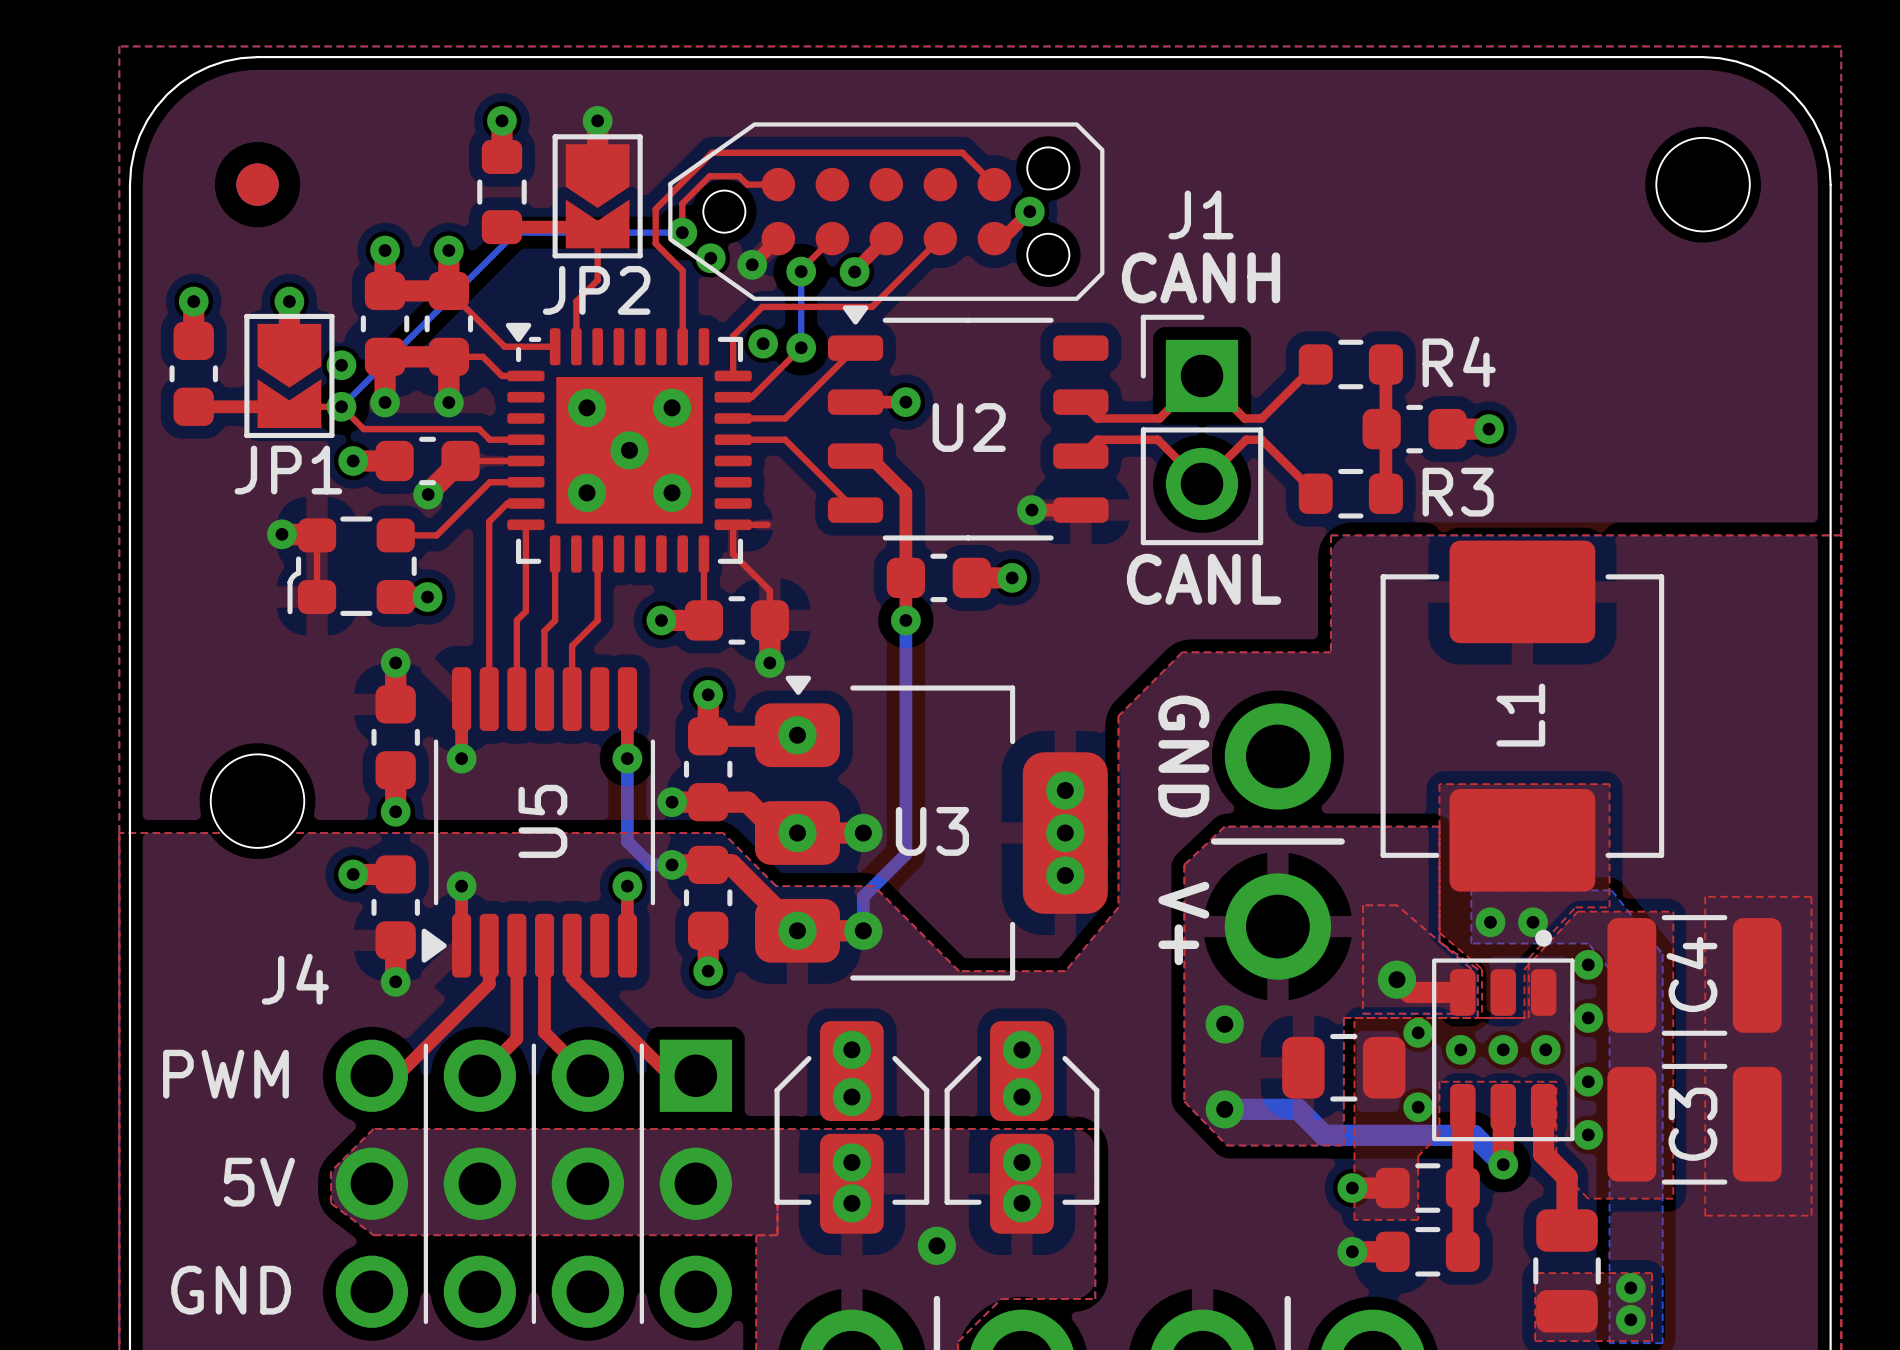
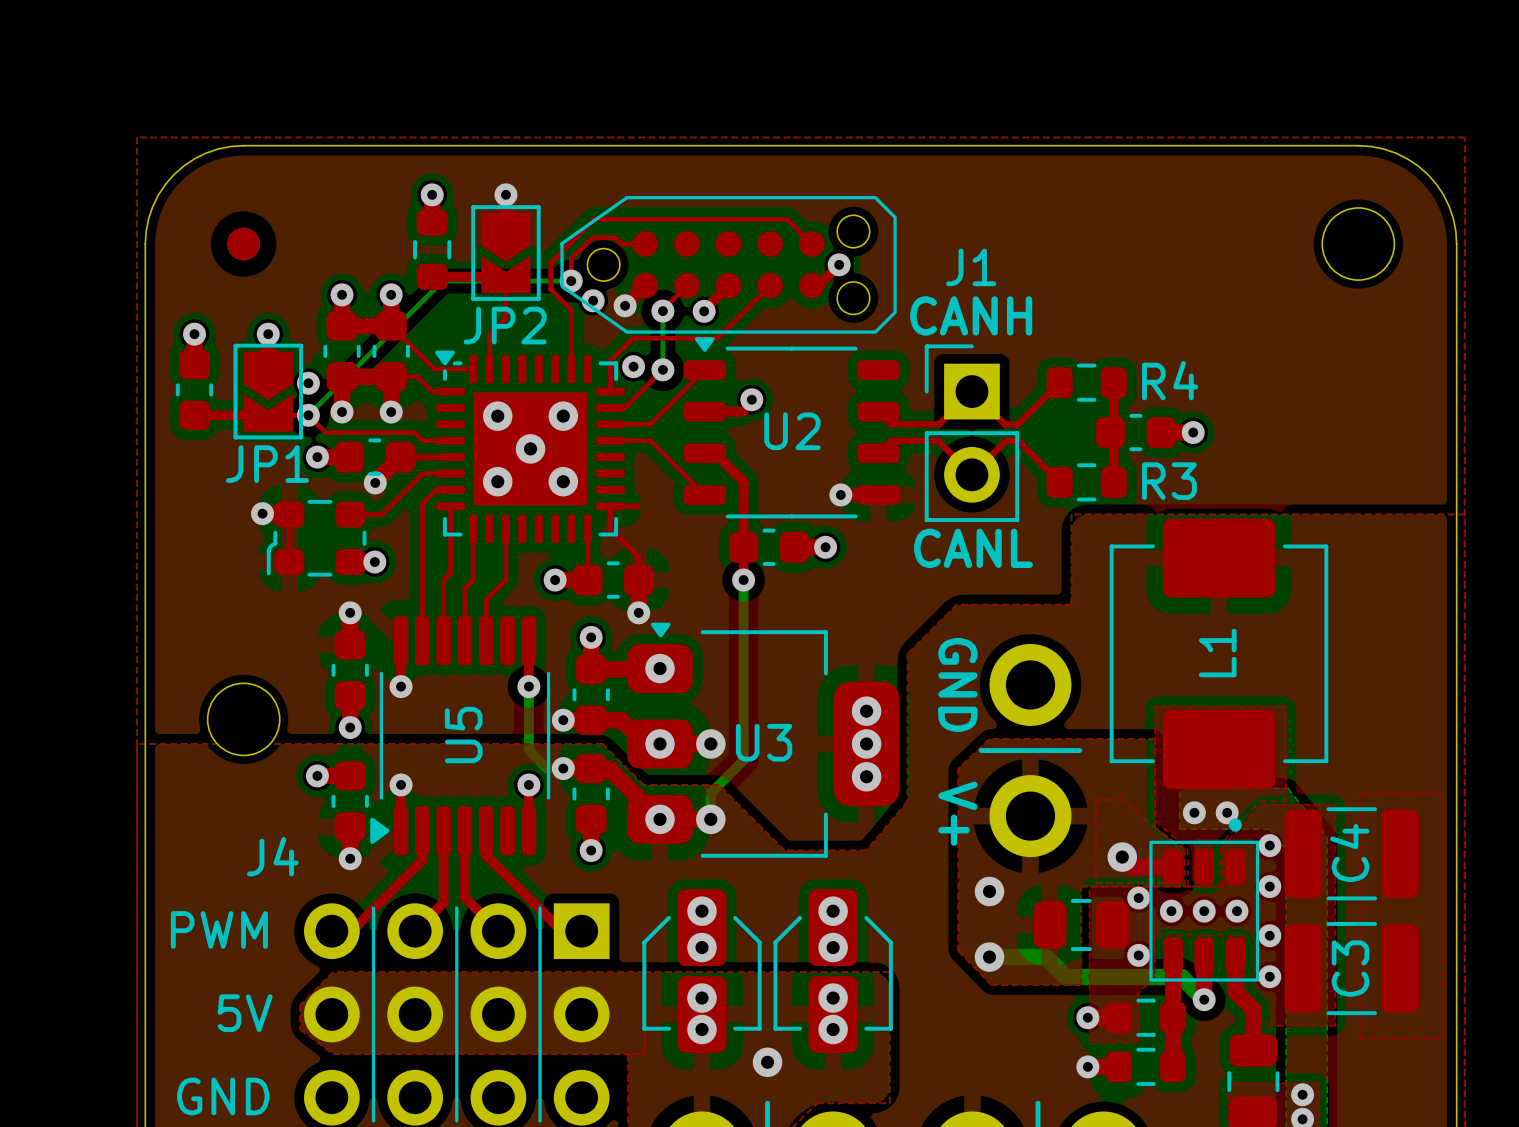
via position: (905, 402) -> (751, 399)

